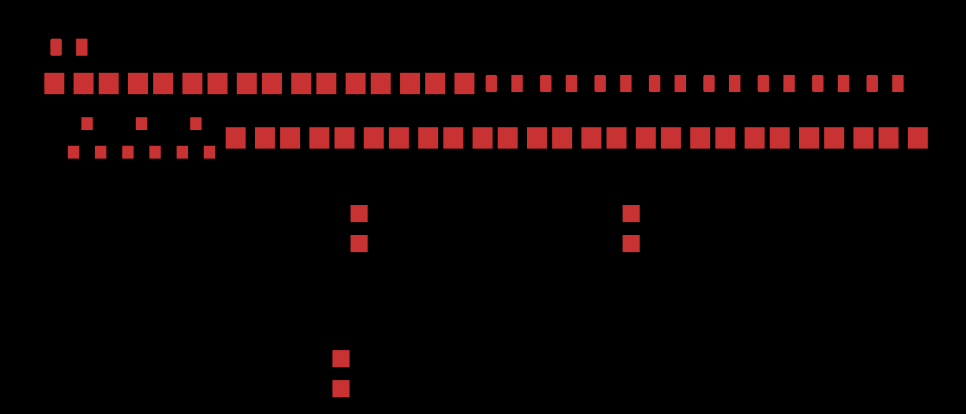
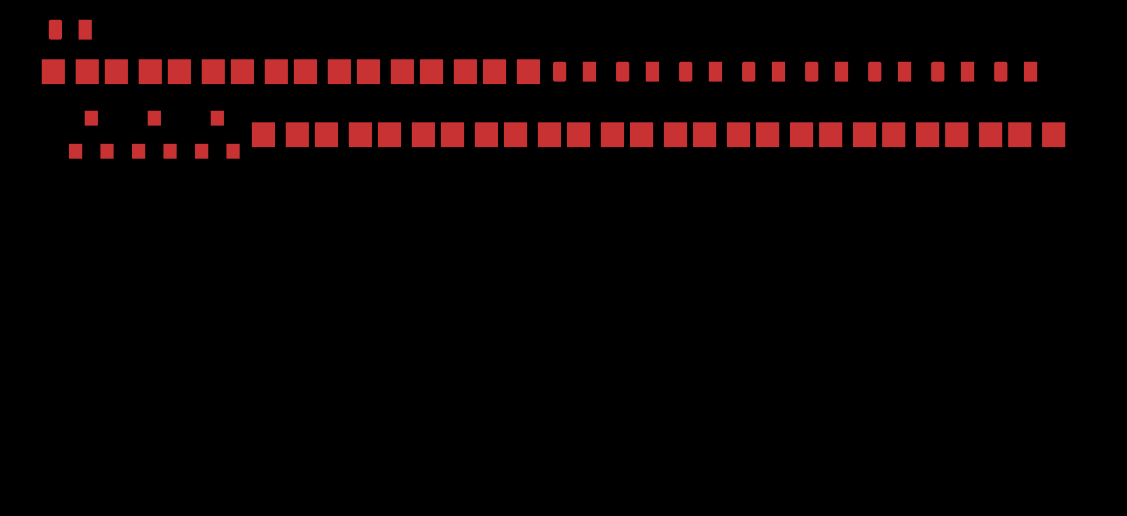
part: (359, 228) -> none
part: (631, 228) -> none
part: (340, 373) -> none

